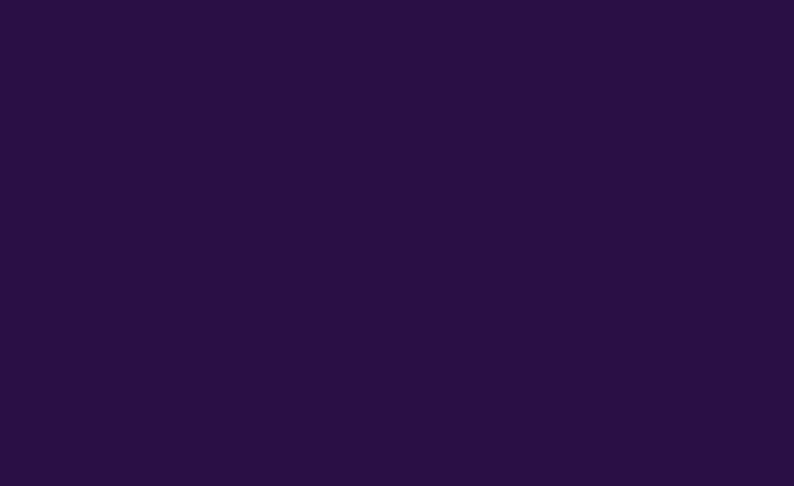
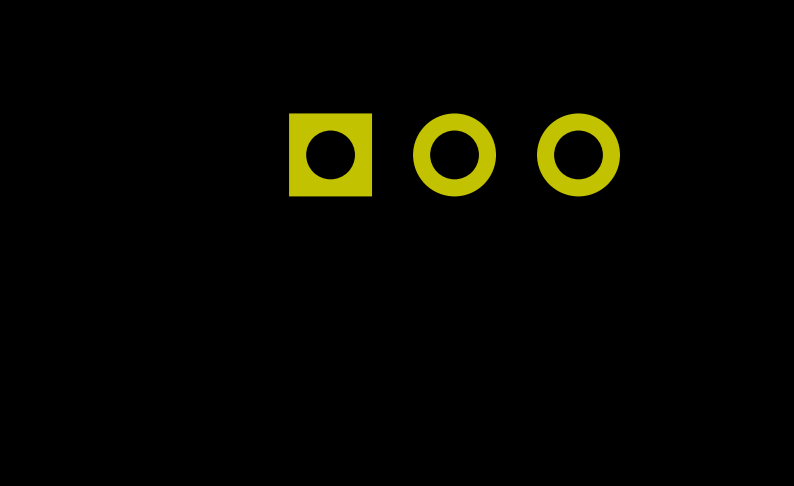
part: none -> (454, 154)

